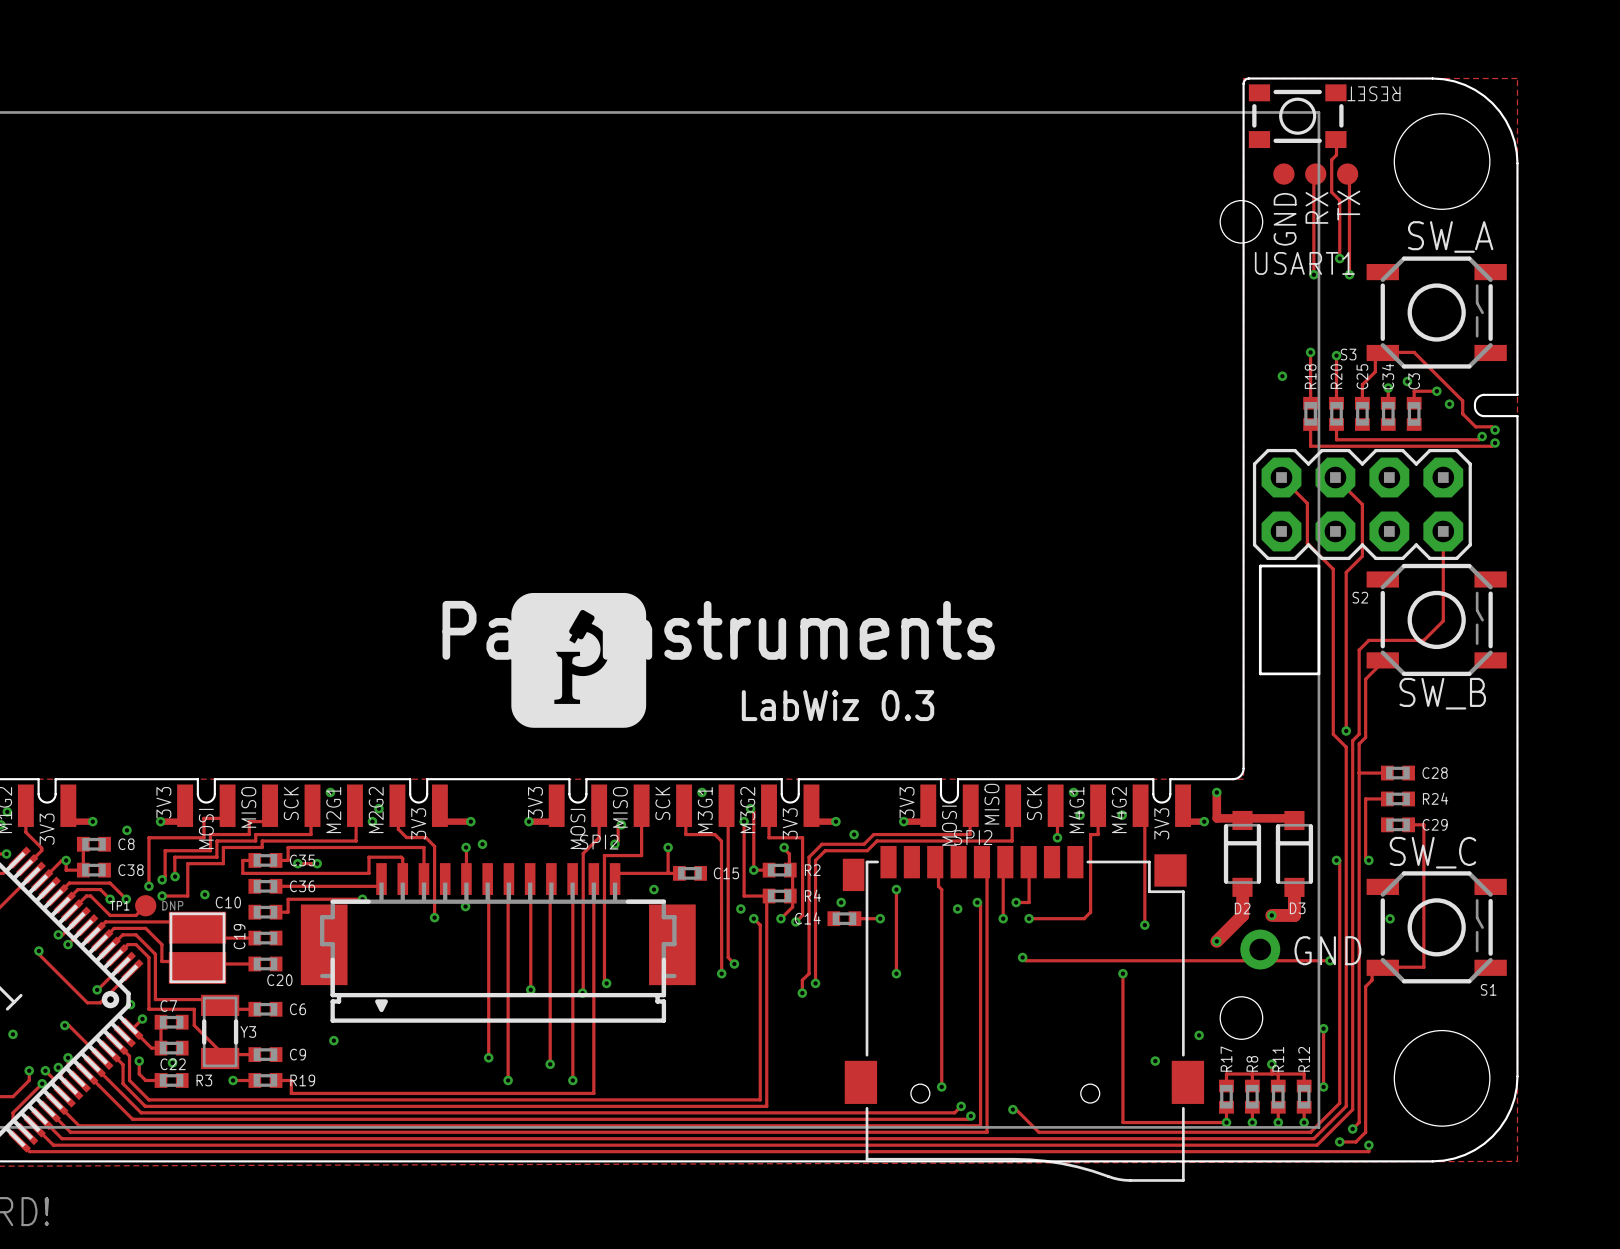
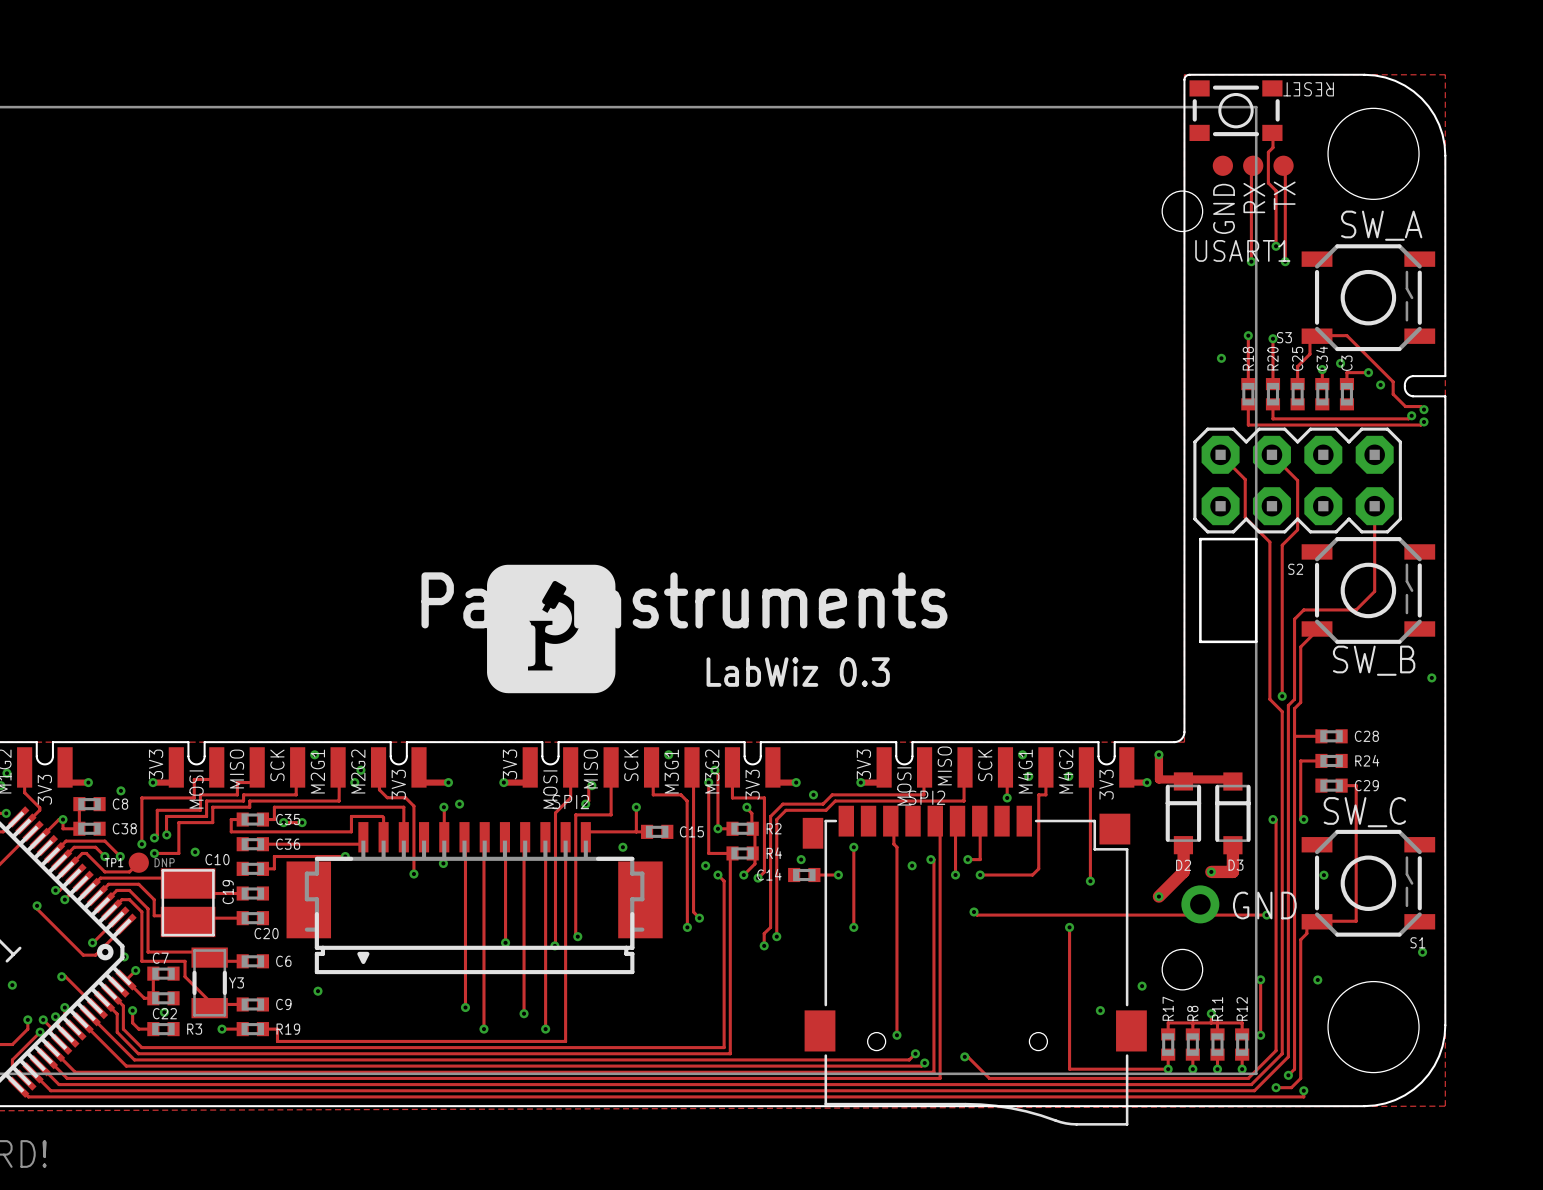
via: none -> (1431, 677)
via: none -> (1422, 952)
via: none -> (1317, 979)

